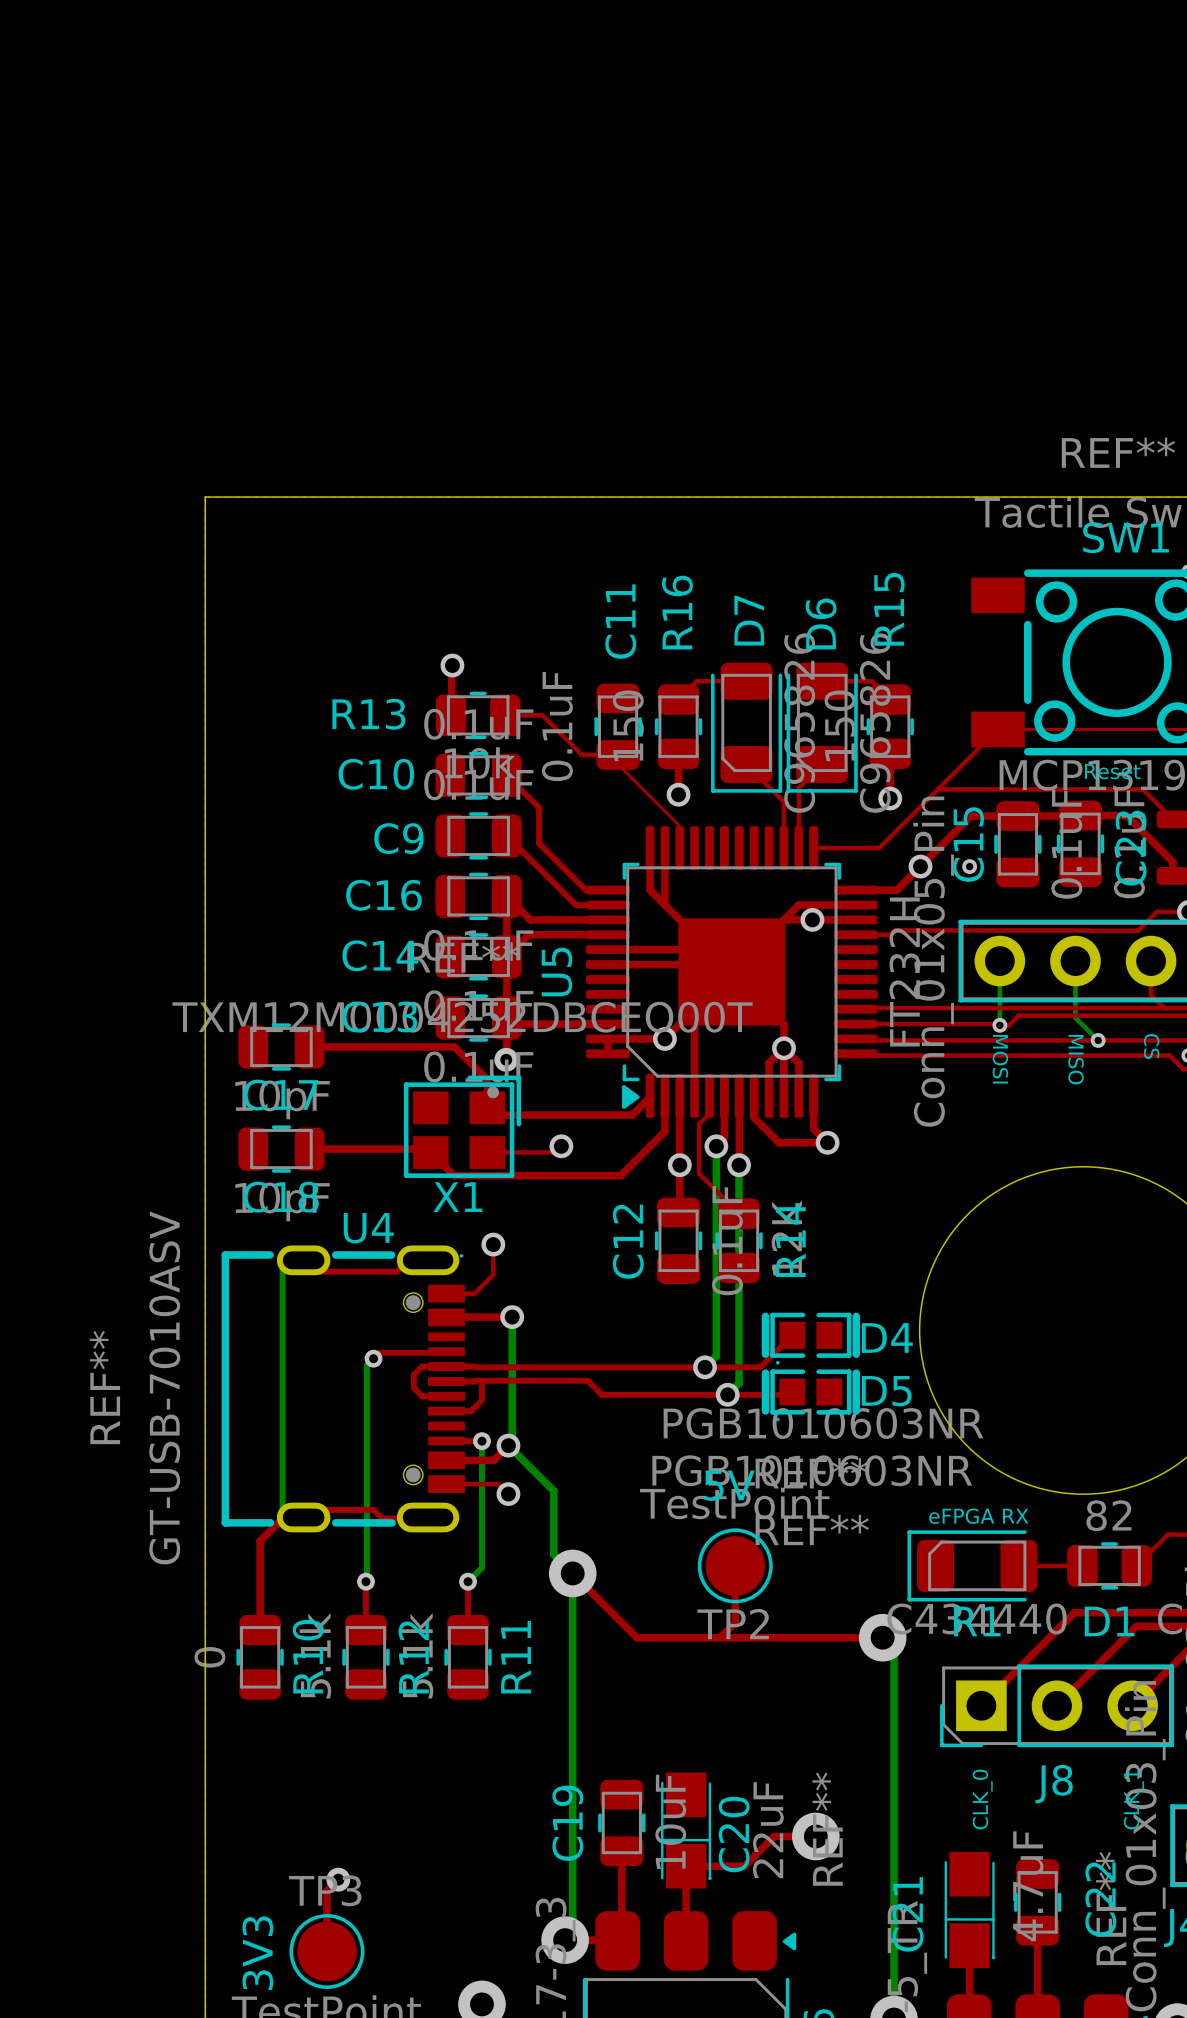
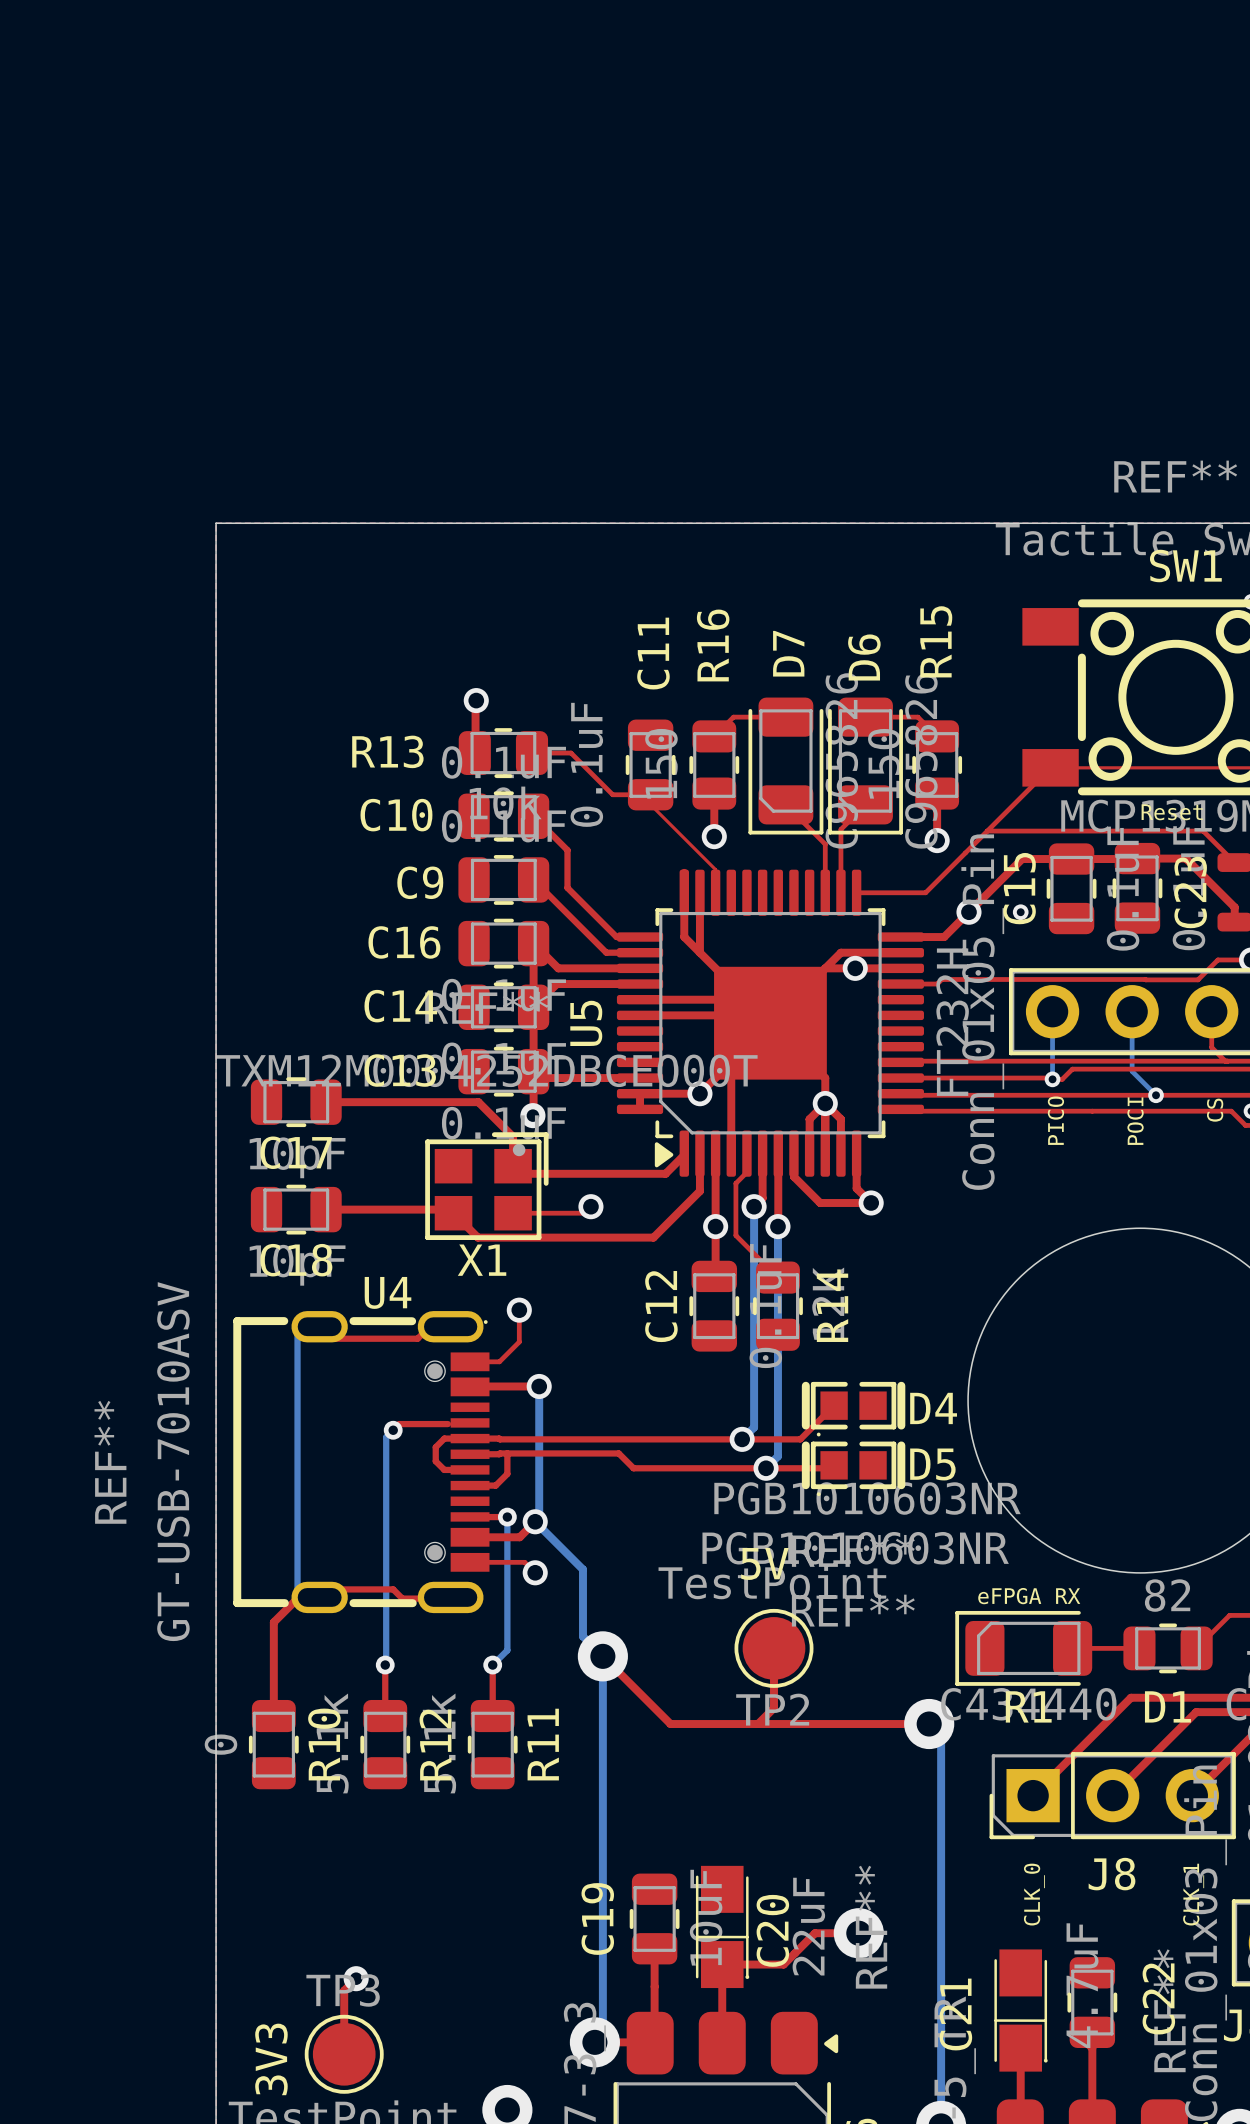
text rotation: 0° (1151, 1046) -> 180° (1215, 1110)
text: MOSI (1000, 1059) -> none
text: MISO (1076, 1059) -> none
text: none -> PICO (1055, 1120)
text: none -> POCI (1135, 1121)

